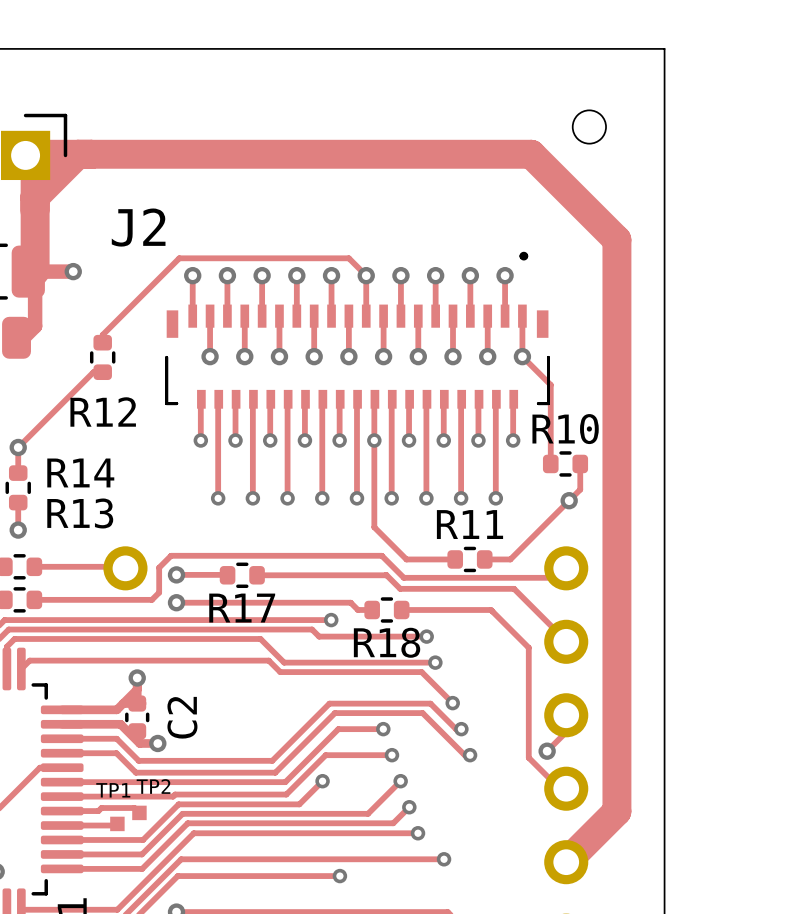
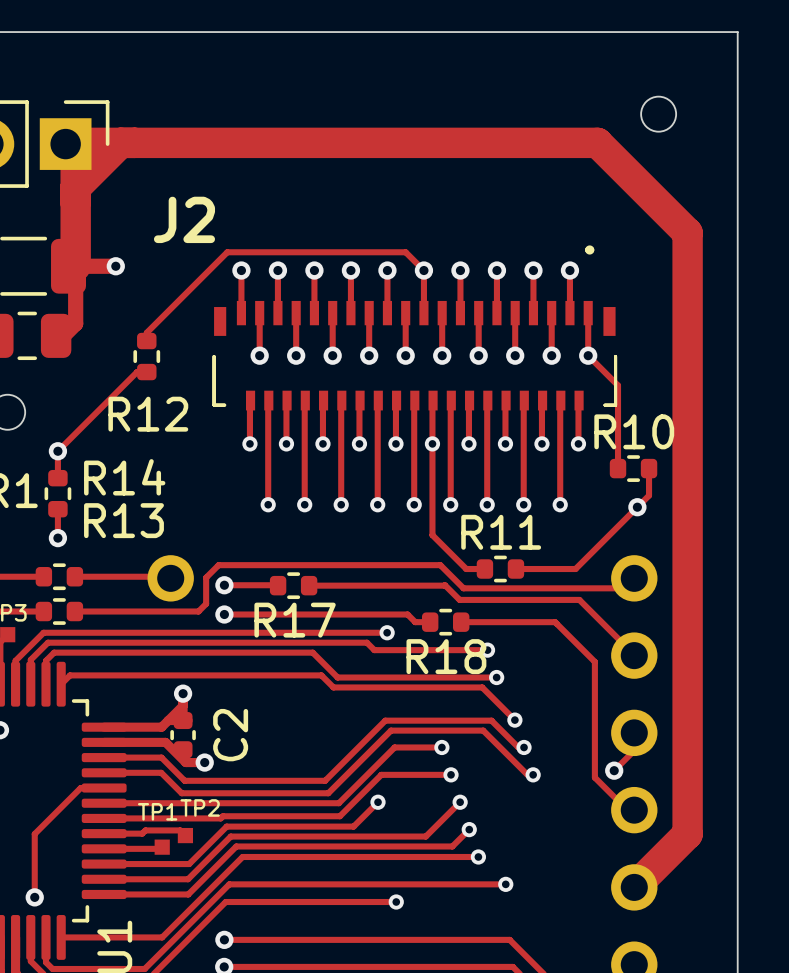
track: (424, 559) (453, 559) -> (517, 569) (548, 569)
R11 position: (469, 559) -> (500, 569)

